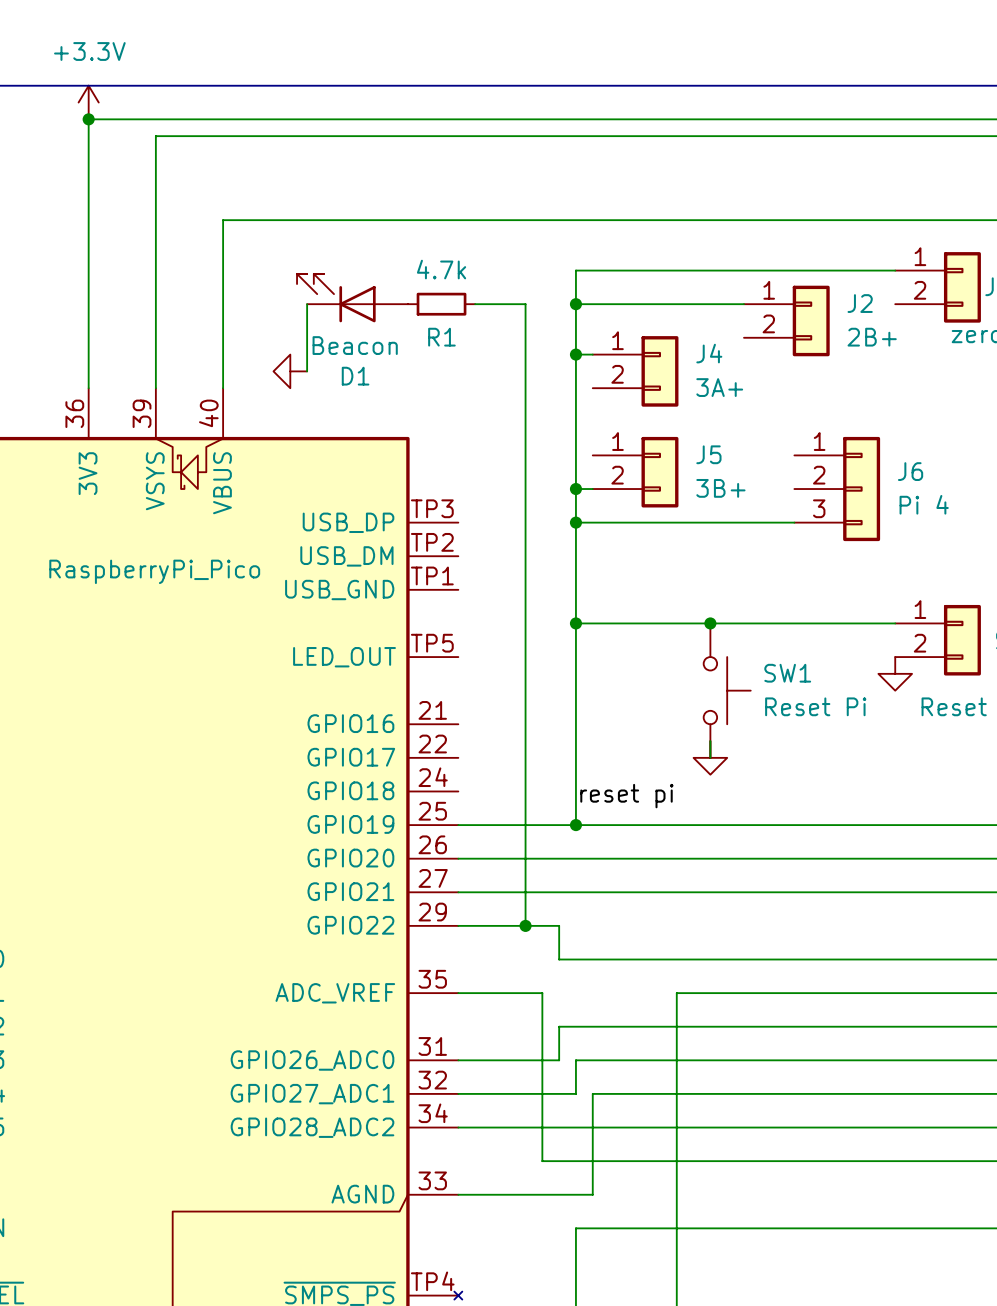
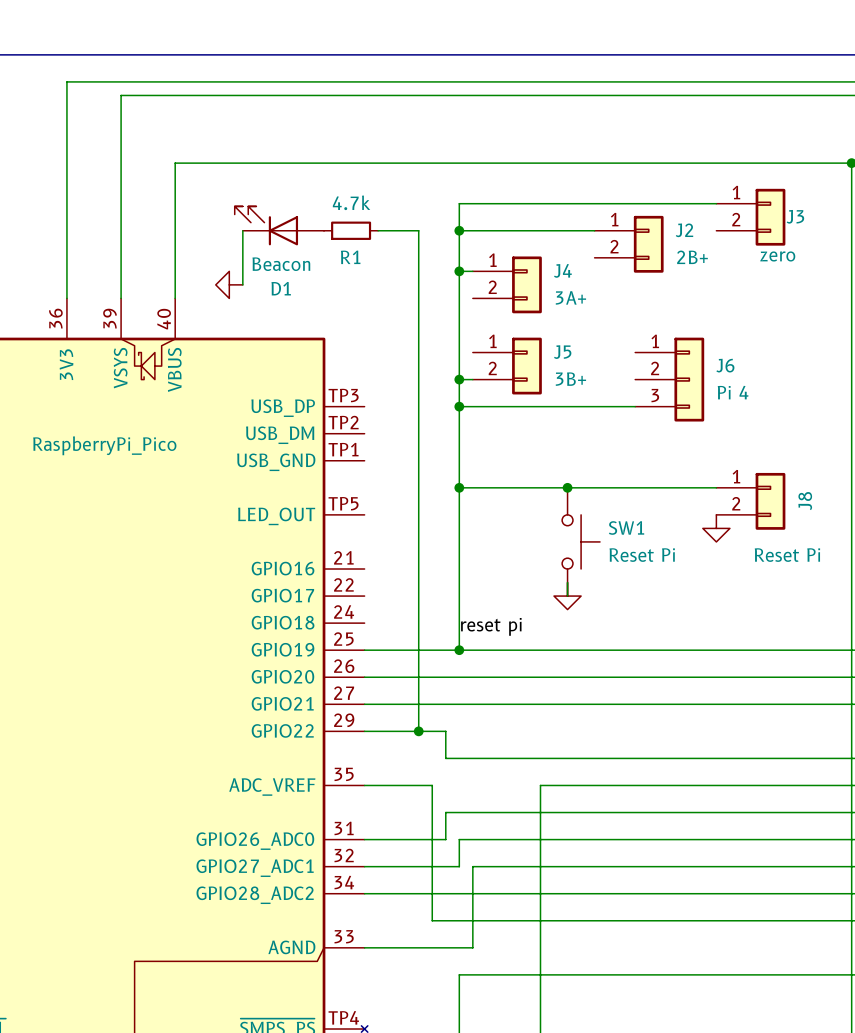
power symbol: +3.3V (88, 102) -> none
junction: (88, 119) -> none

